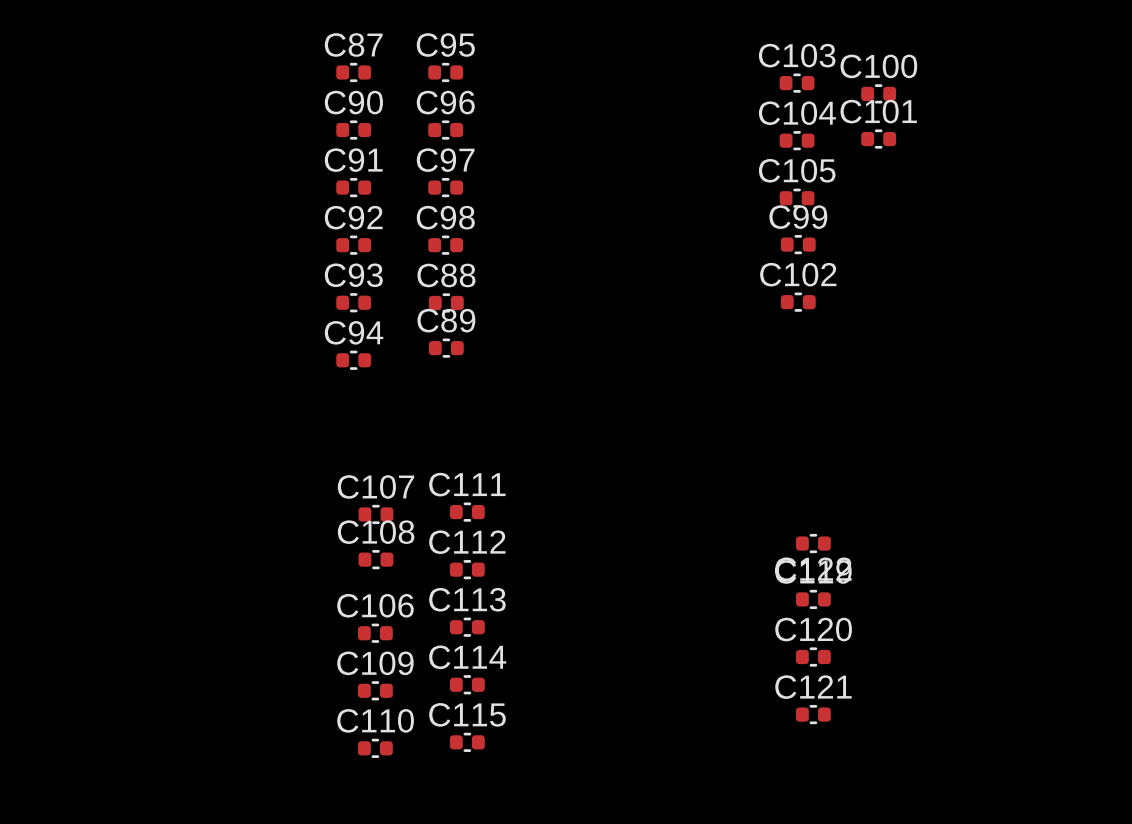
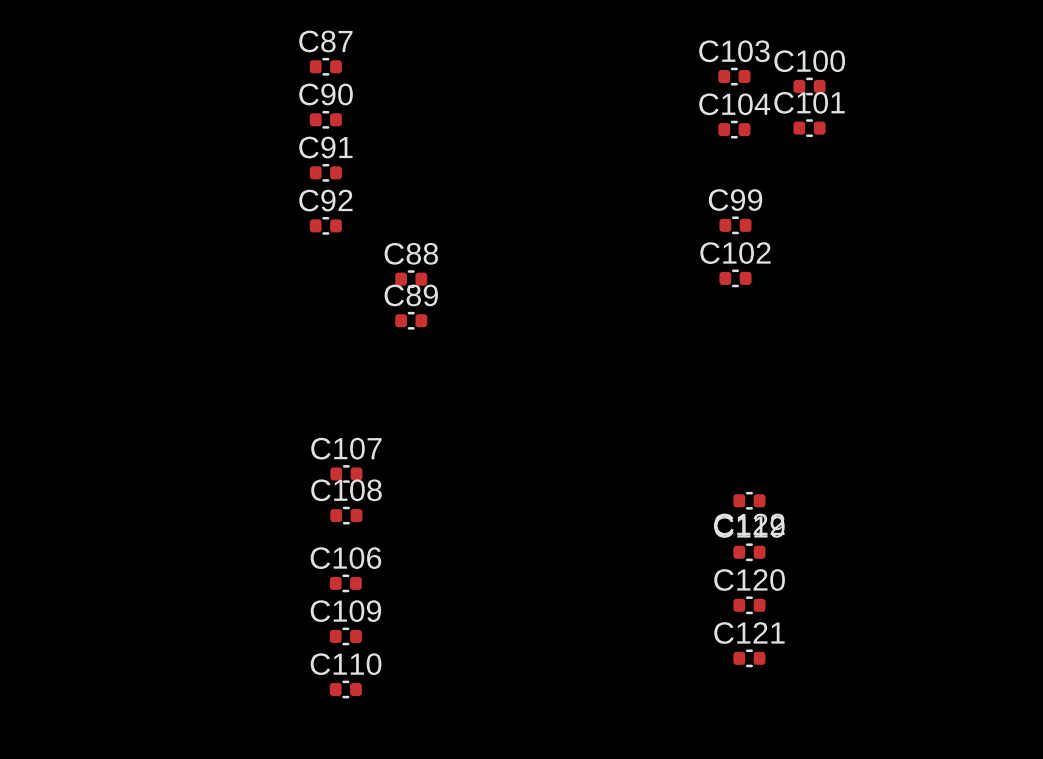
C95: (445, 72) -> none
C96: (445, 130) -> none
C97: (445, 187) -> none
C105: (797, 198) -> none
C98: (445, 245) -> none
C93: (353, 302) -> none
C94: (353, 360) -> none
C111: (467, 512) -> none
C112: (467, 569) -> none
C113: (467, 627) -> none
C114: (467, 684) -> none
C115: (467, 742) -> none

